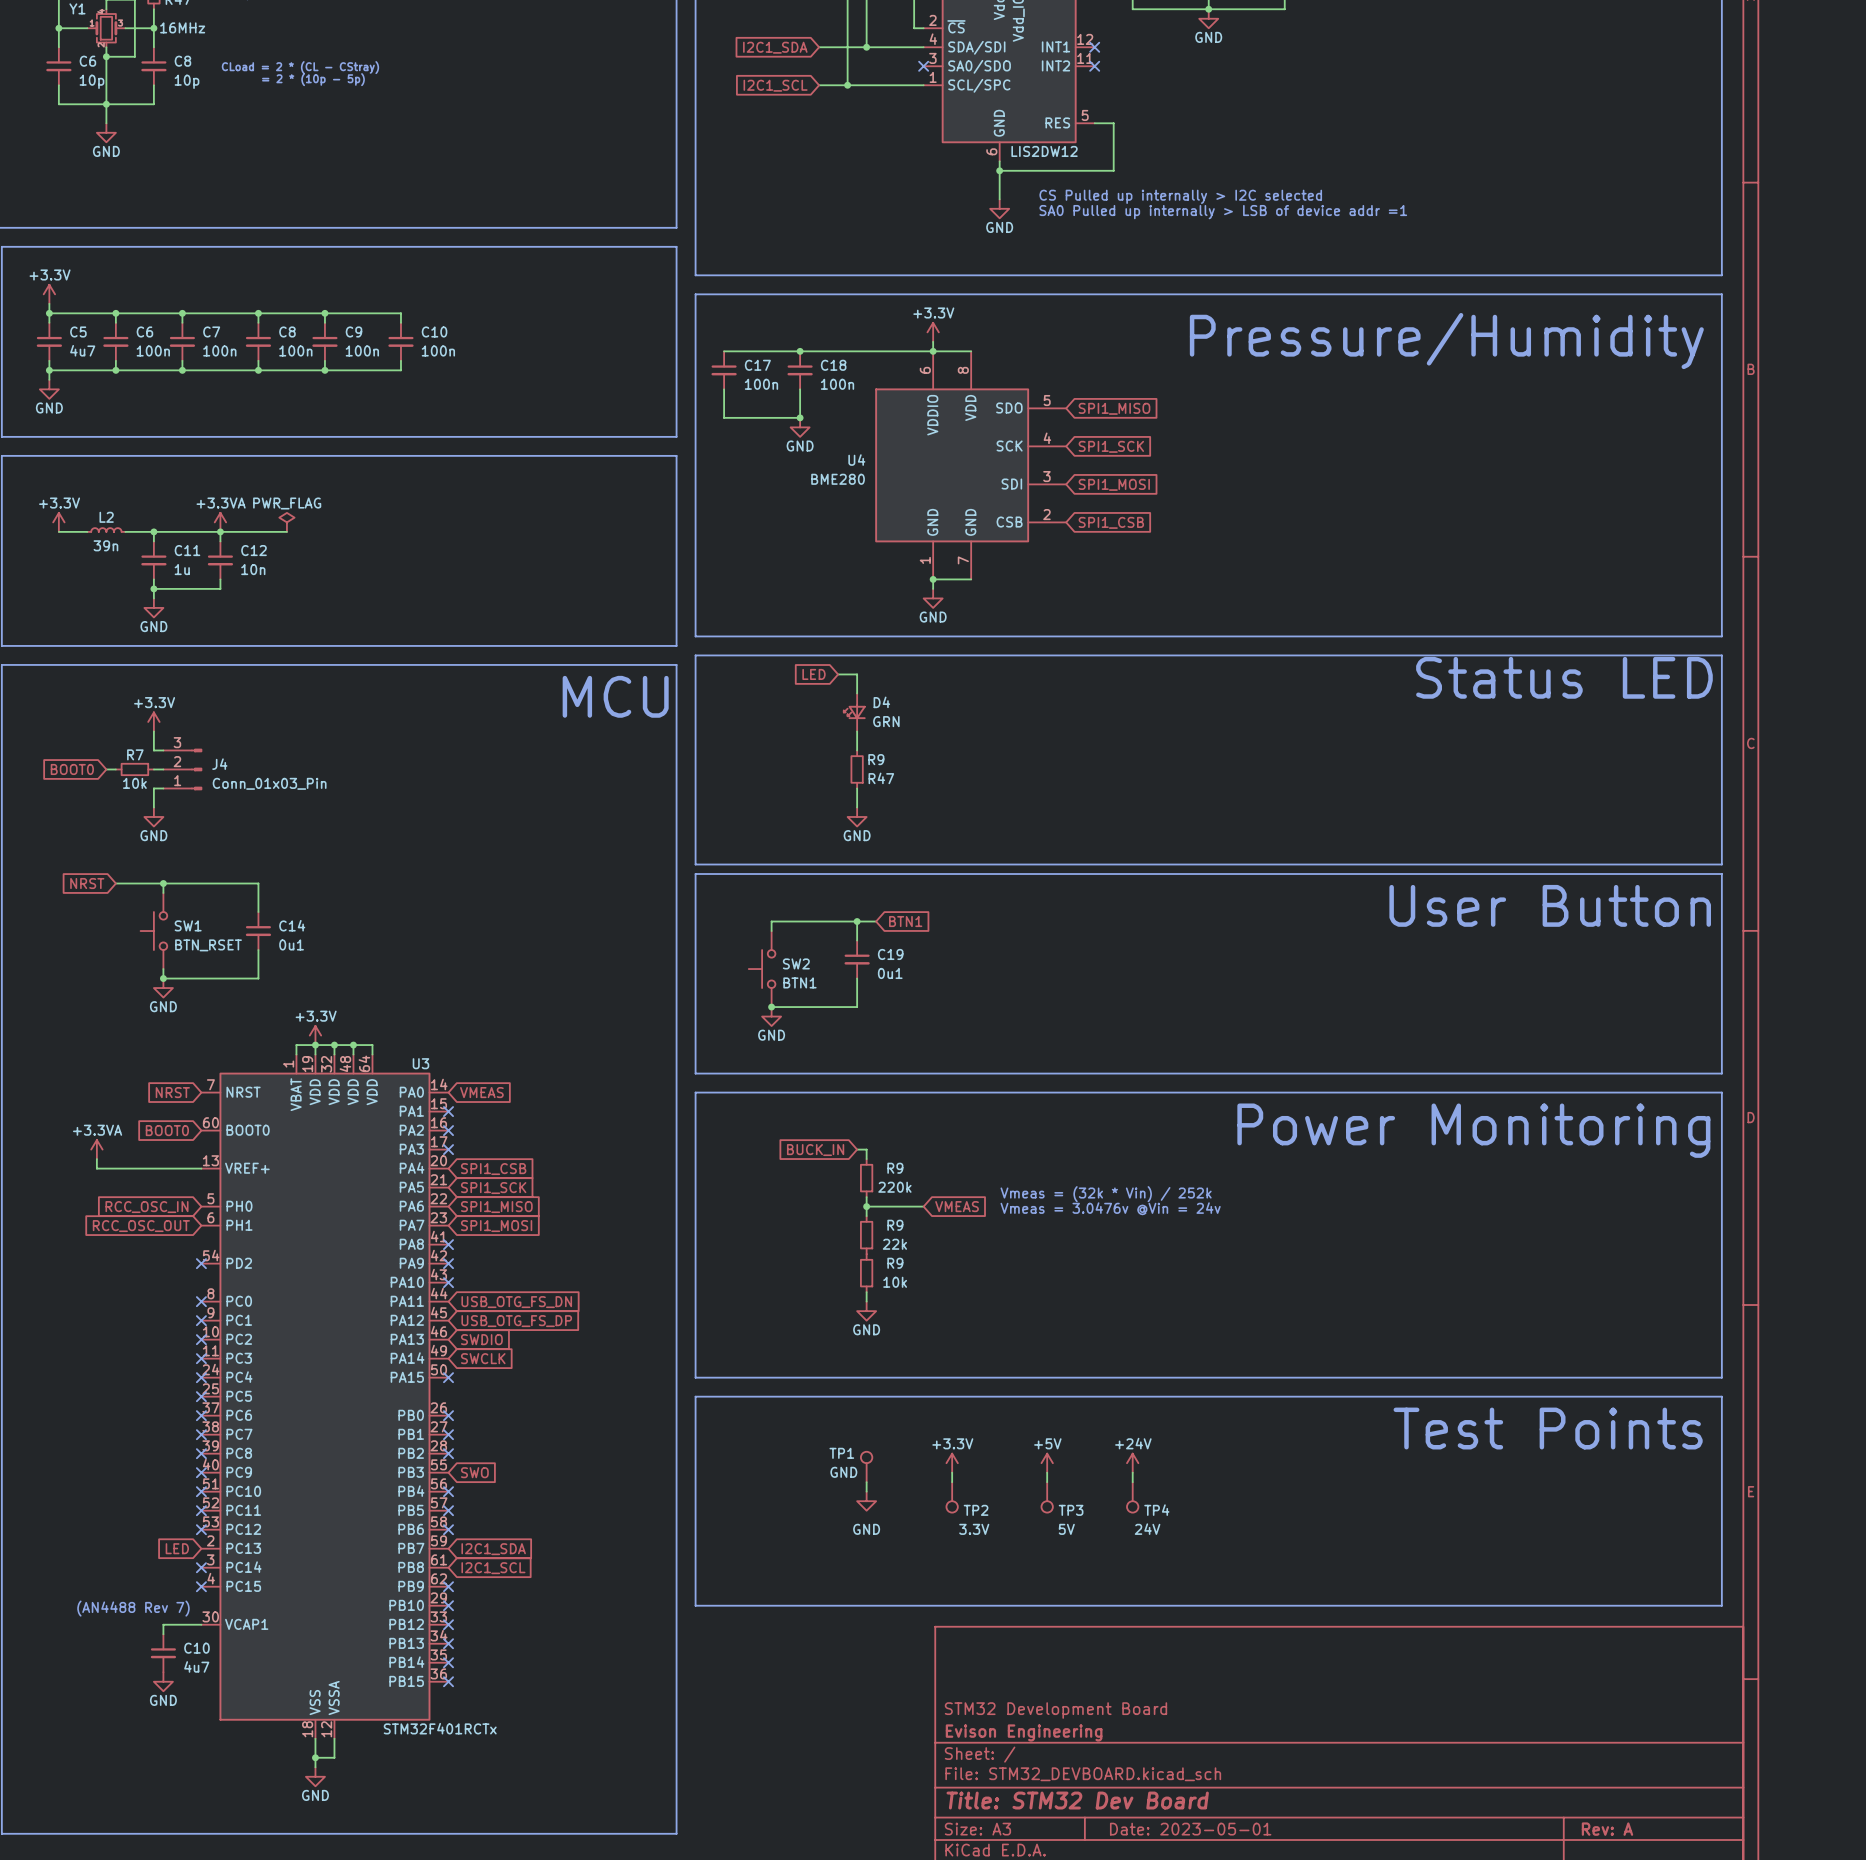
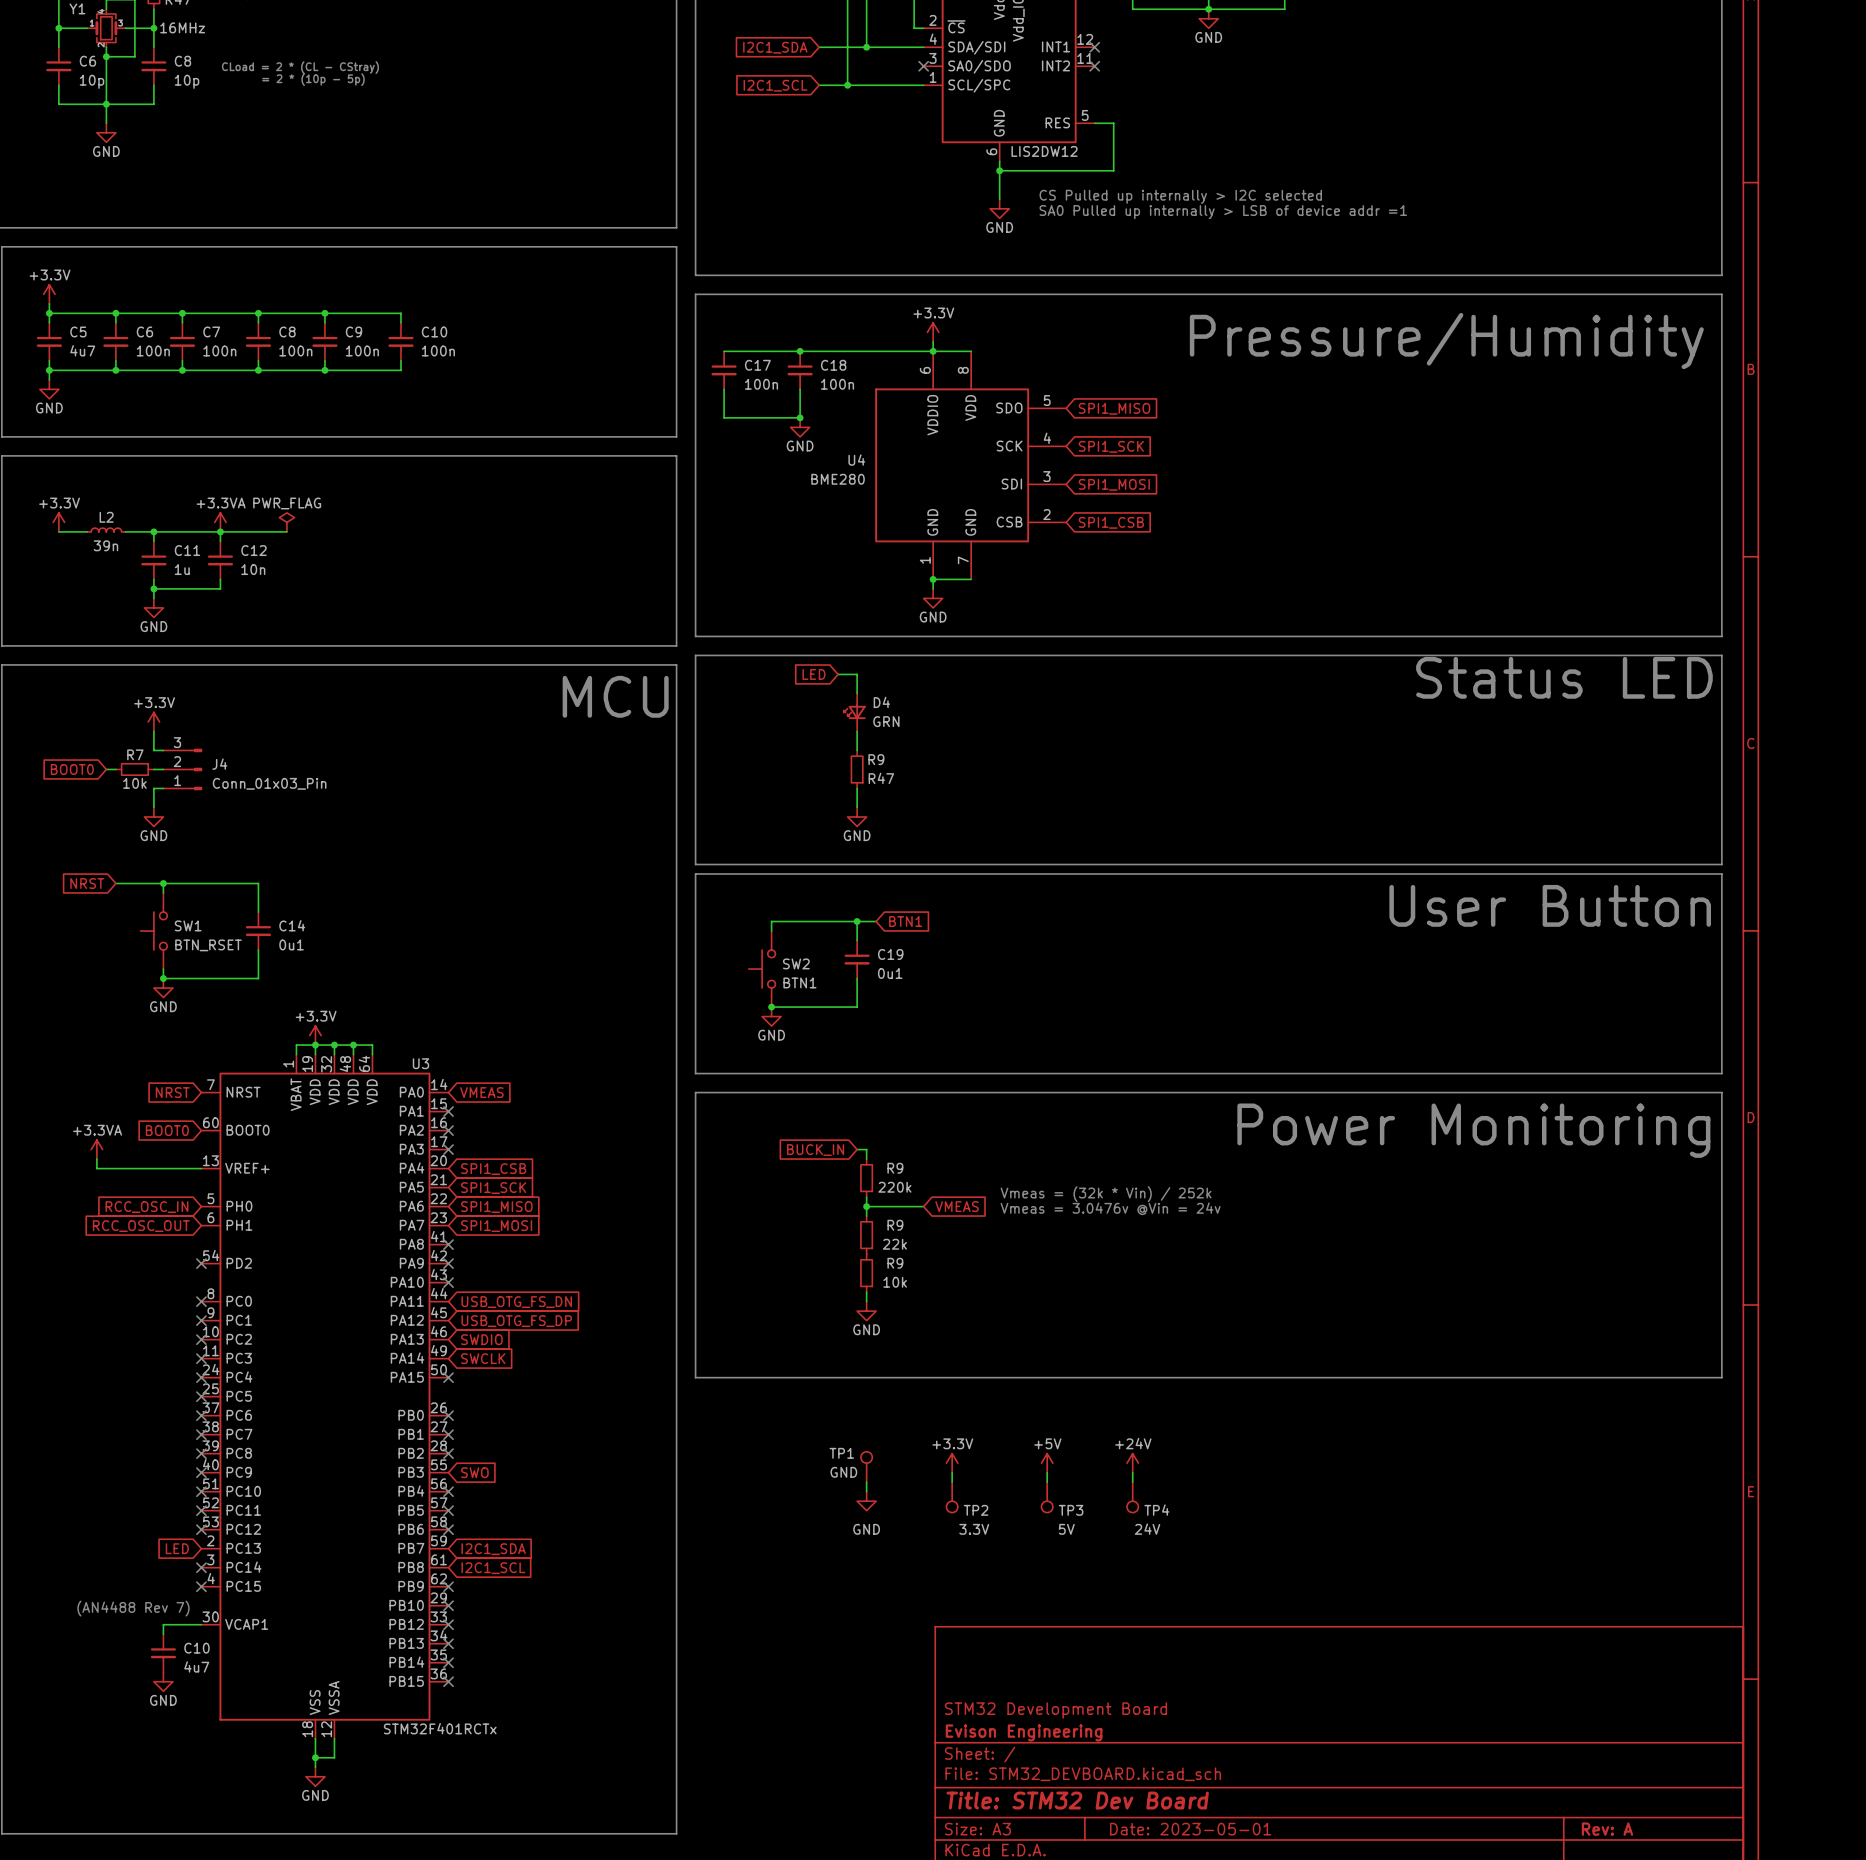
line: (695, 1396) (1721, 1396) (1721, 1605) (695, 1605) (695, 1396) -> none
text: Test Points (1548, 1428) -> none

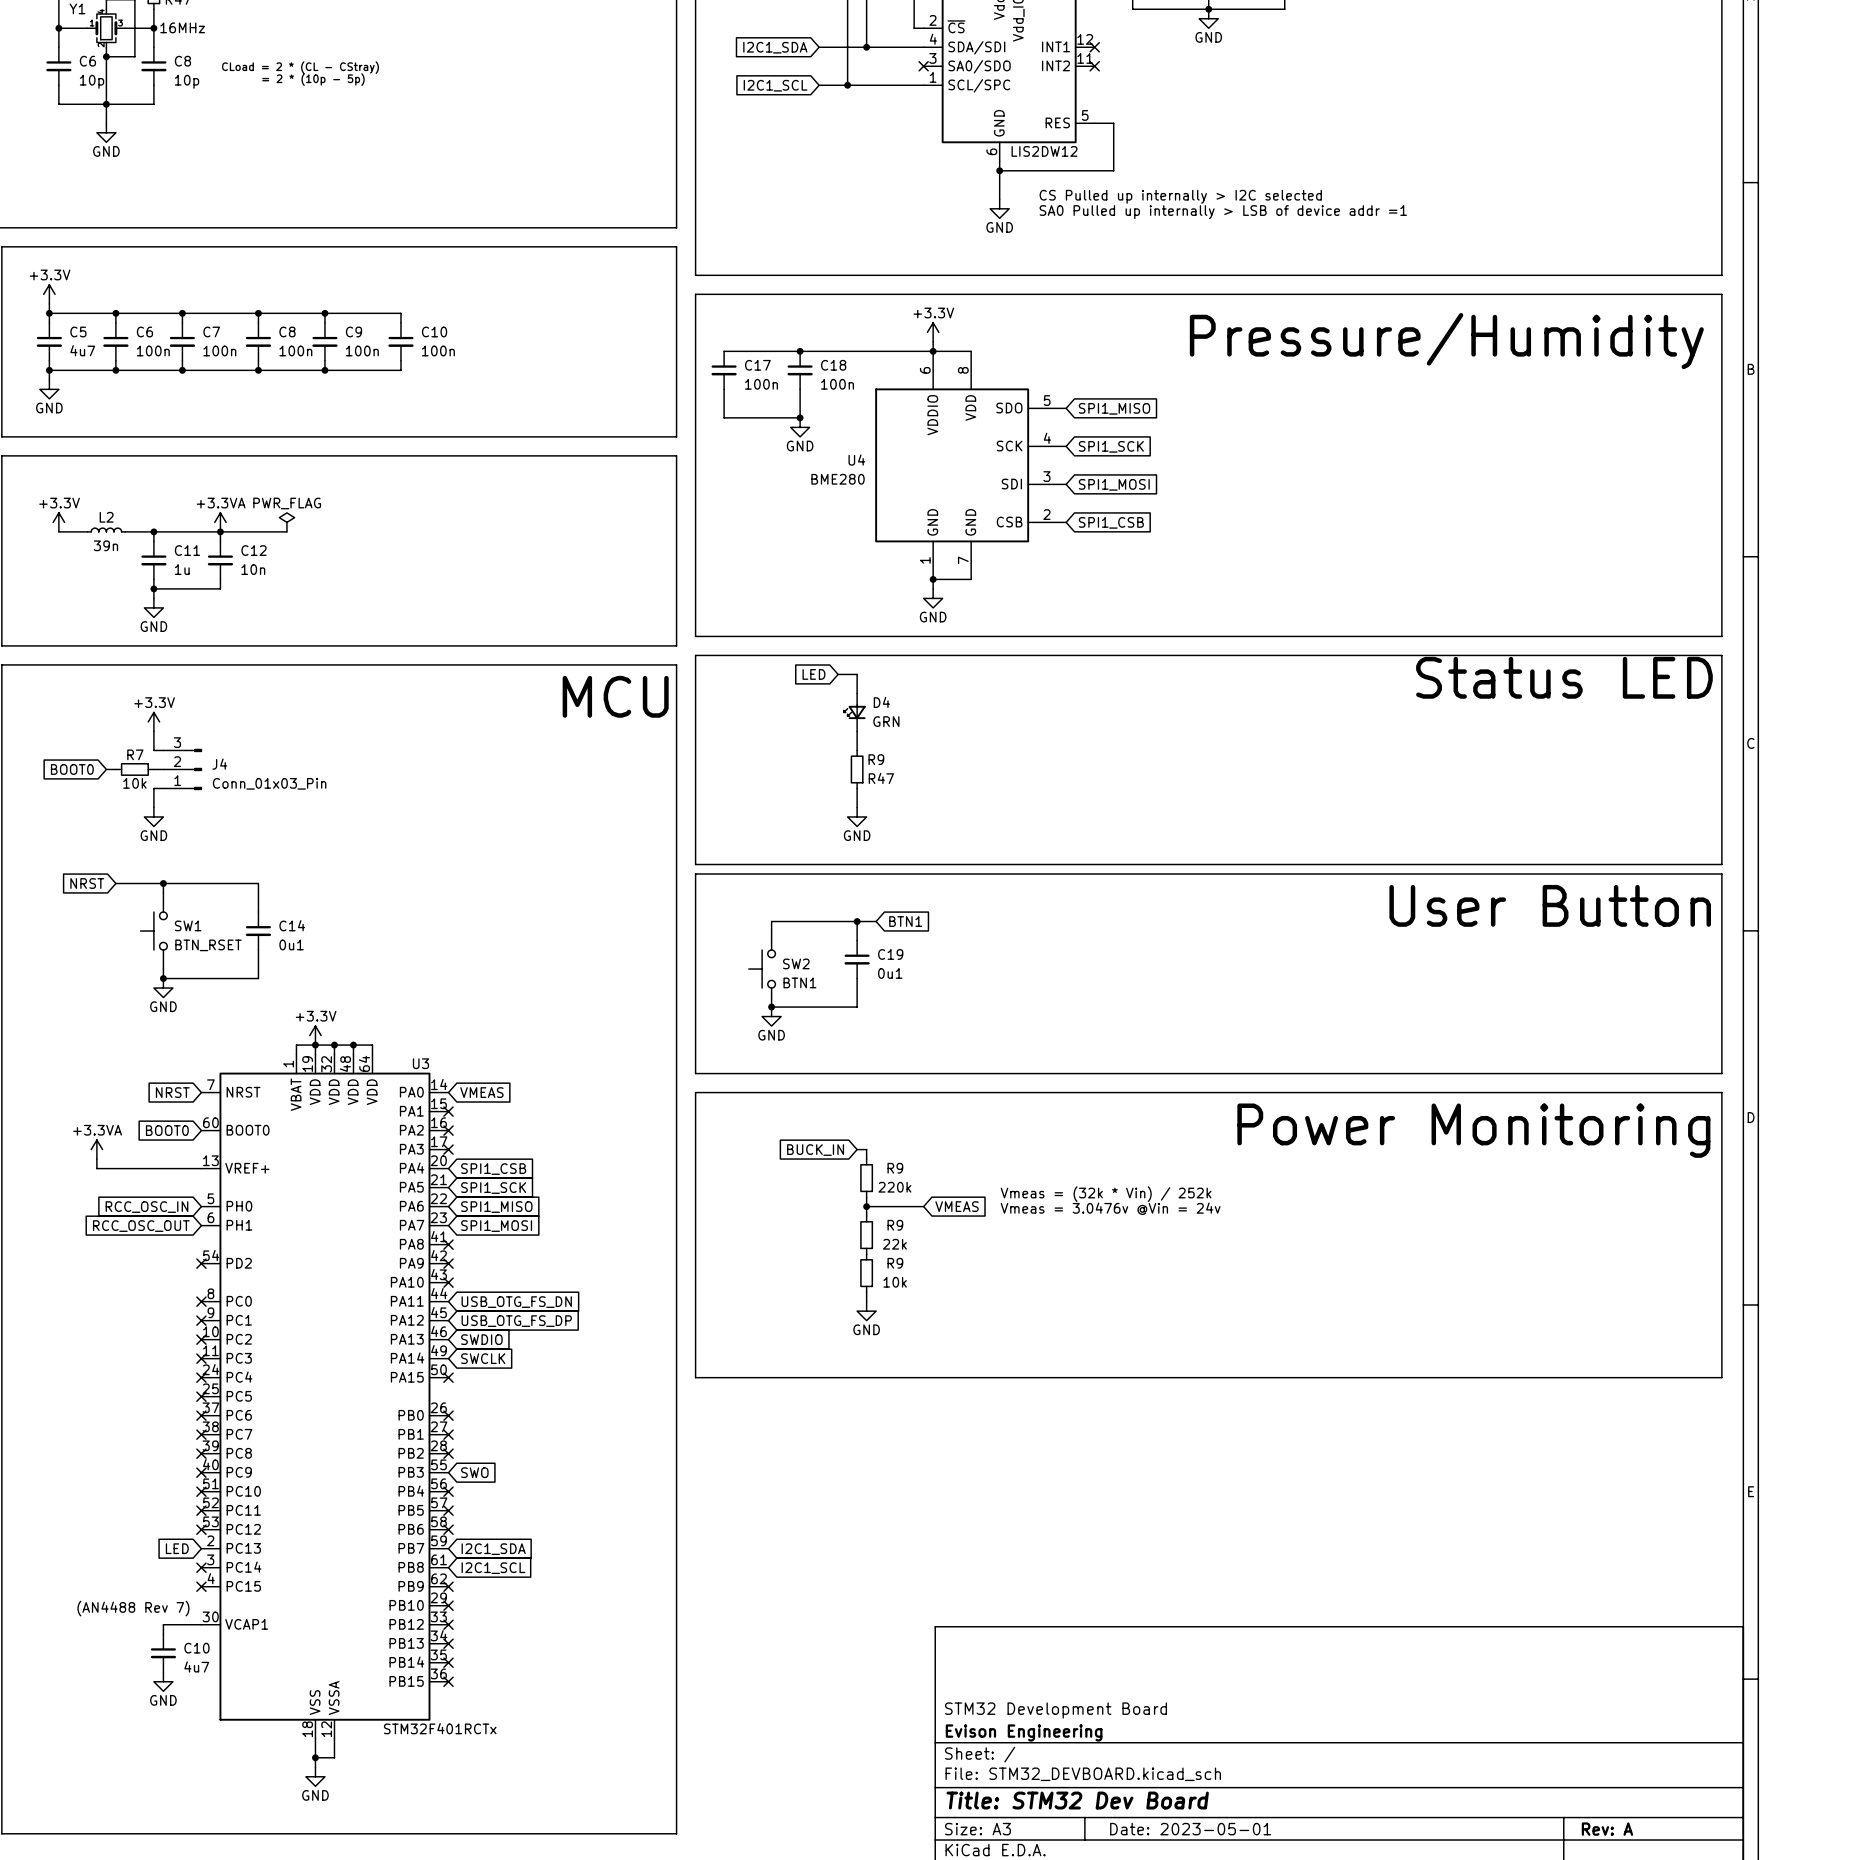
power symbol: +3.3V (952, 1463) -> none
power symbol: +5V (1047, 1463) -> none
power symbol: +24V (1132, 1463) -> none
TP1: GND (866, 1466) -> none
wire: (952, 1472) (952, 1482) -> none
wire: (1047, 1472) (1047, 1482) -> none
wire: (1132, 1472) (1132, 1482) -> none
wire: (866, 1482) (866, 1491) -> none
TP2: 3.3V (952, 1497) -> none
TP3: 5V (1047, 1497) -> none
TP4: 24V (1132, 1497) -> none
power symbol: GND (866, 1501) -> none

